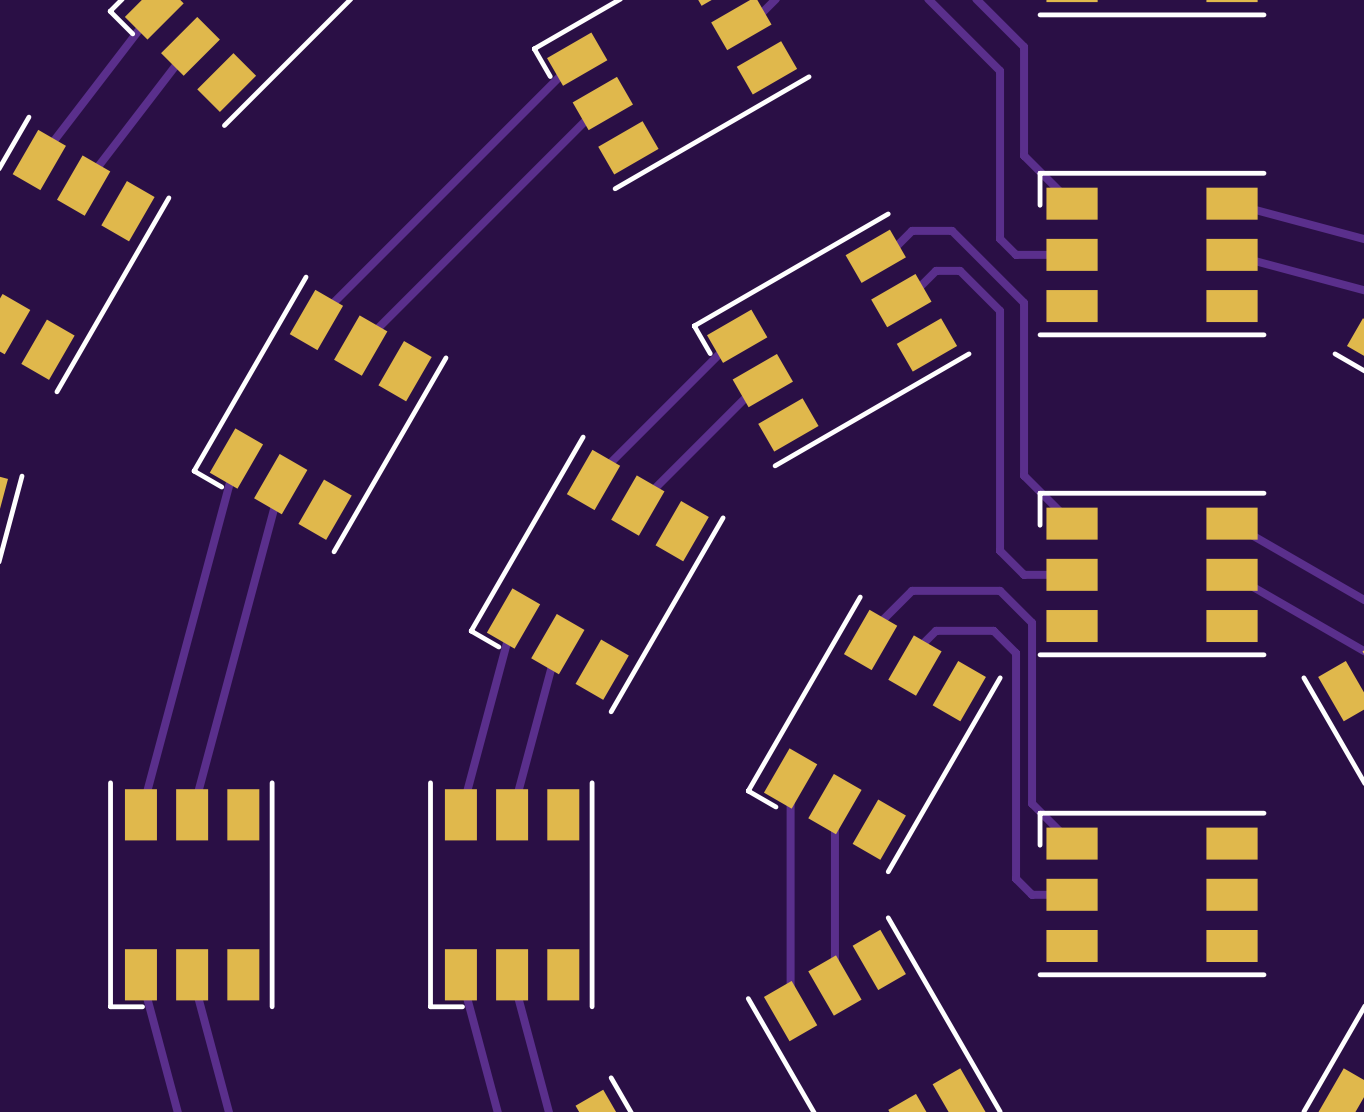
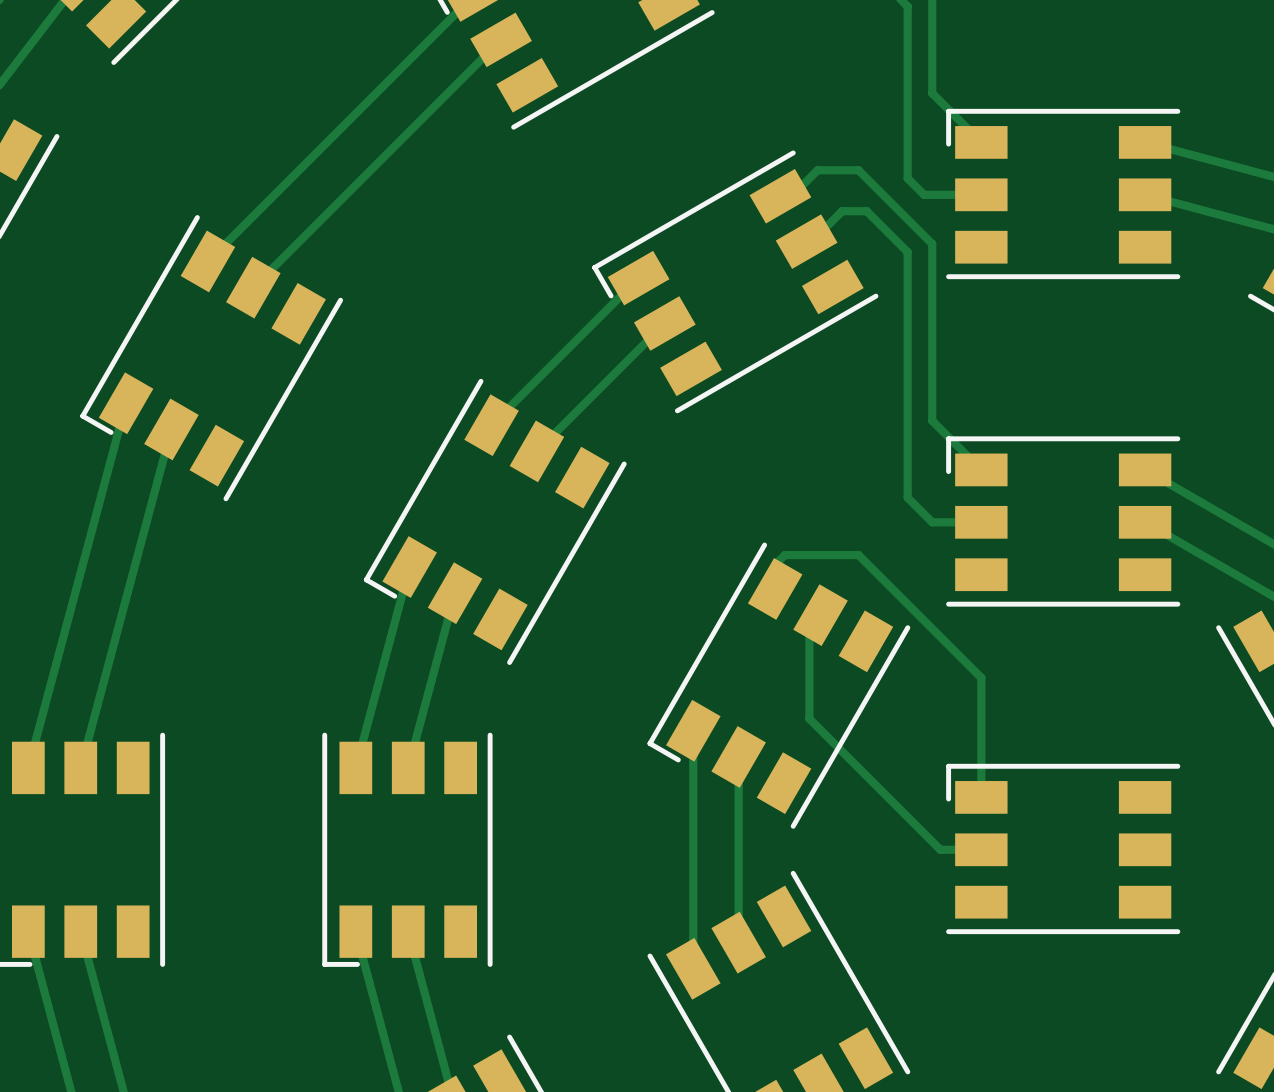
track: (870, 632) (912, 590) (1000, 590) (1032, 622) (1032, 803) (1072, 843) -> (775, 564) (784, 555) (858, 555) (981, 677) (981, 797)
track: (914, 665) (914, 651) (936, 630) (993, 630) (1016, 653) (1016, 878) -> (809, 620) (809, 718) (924, 833)

